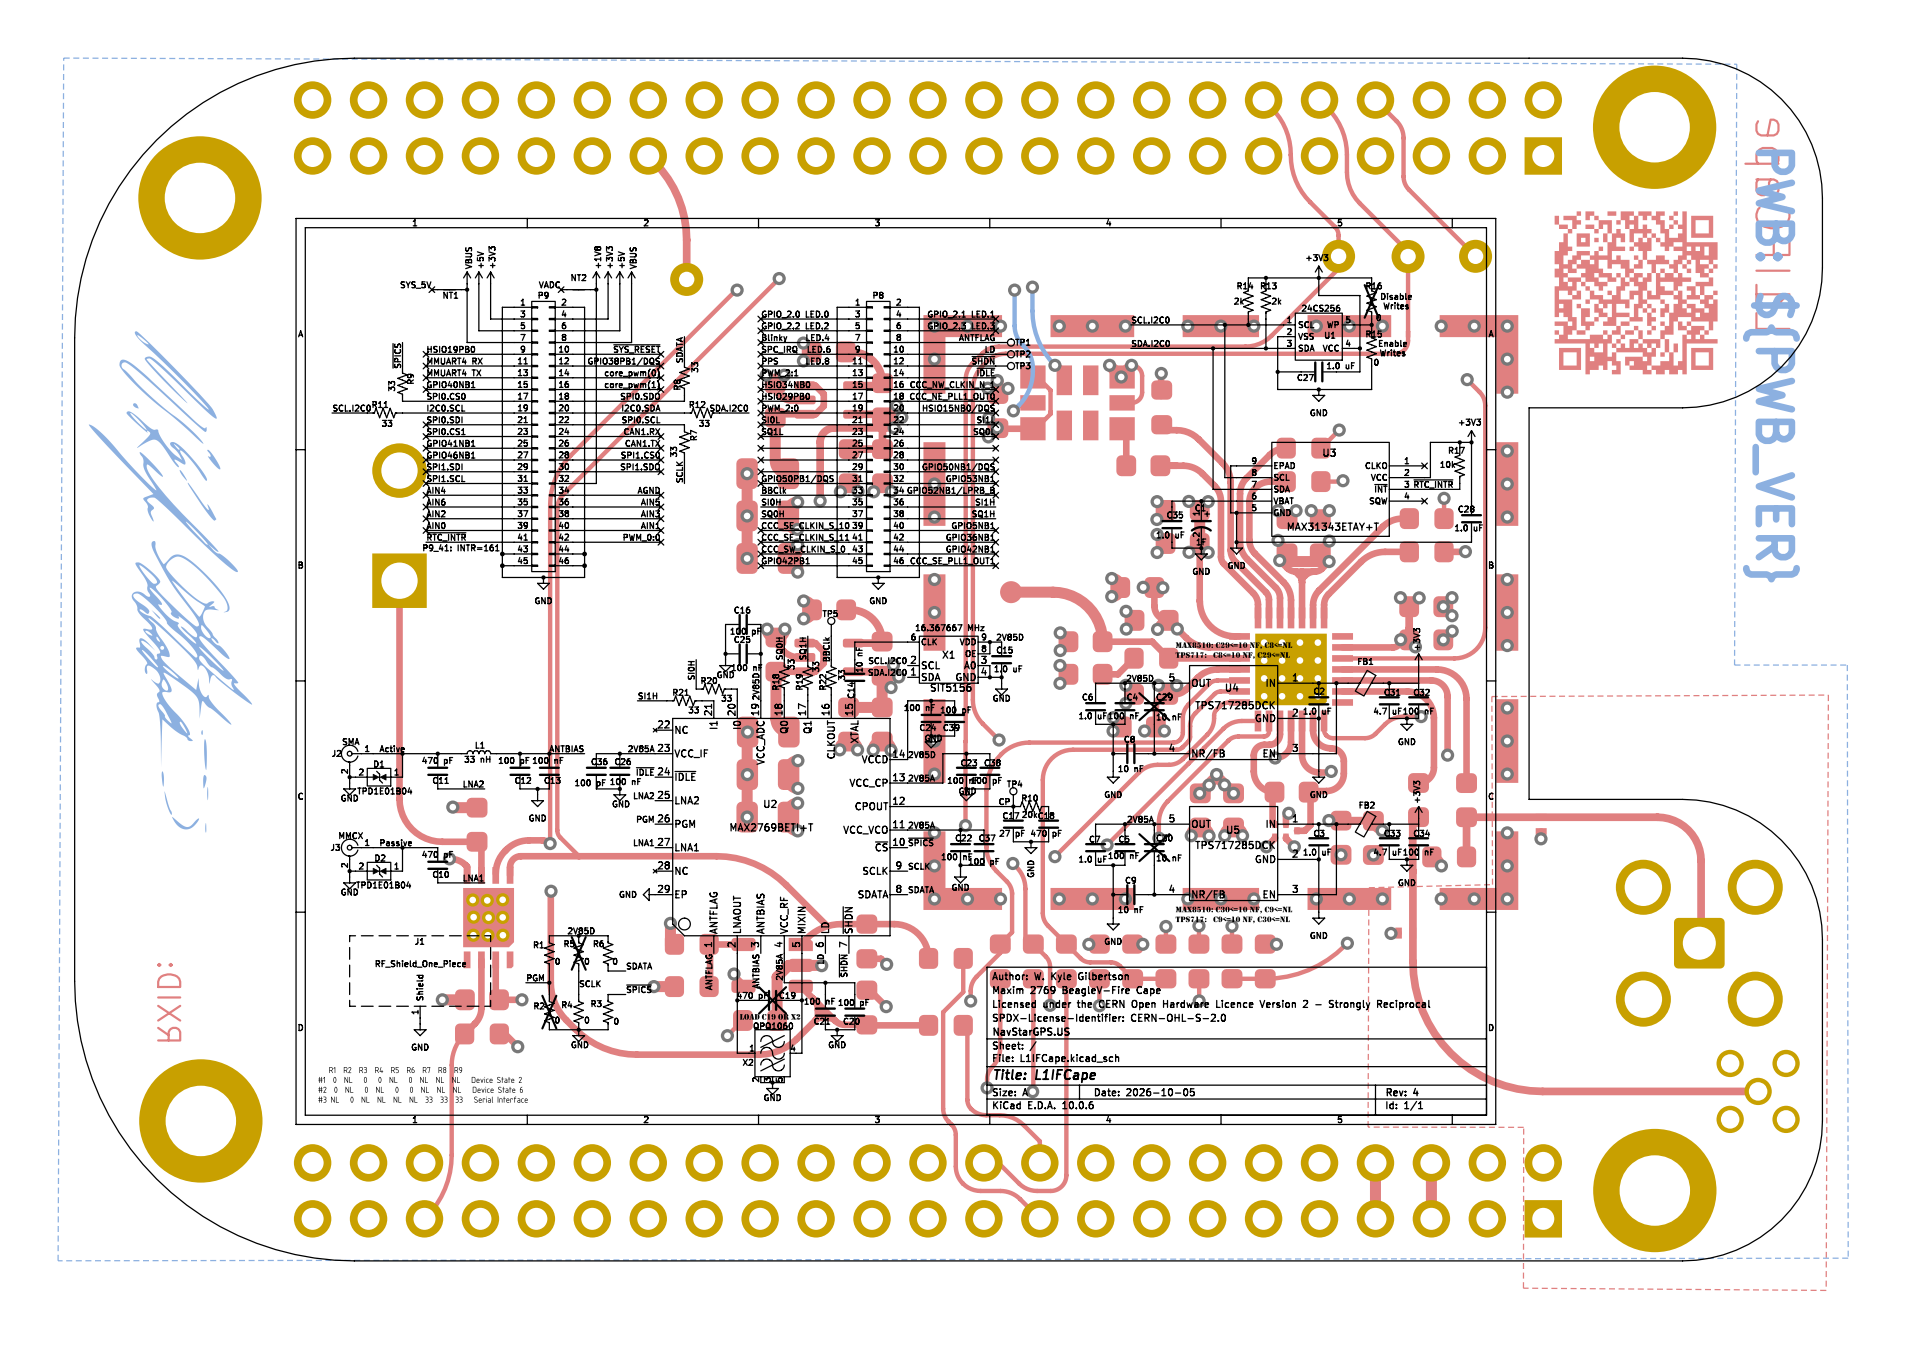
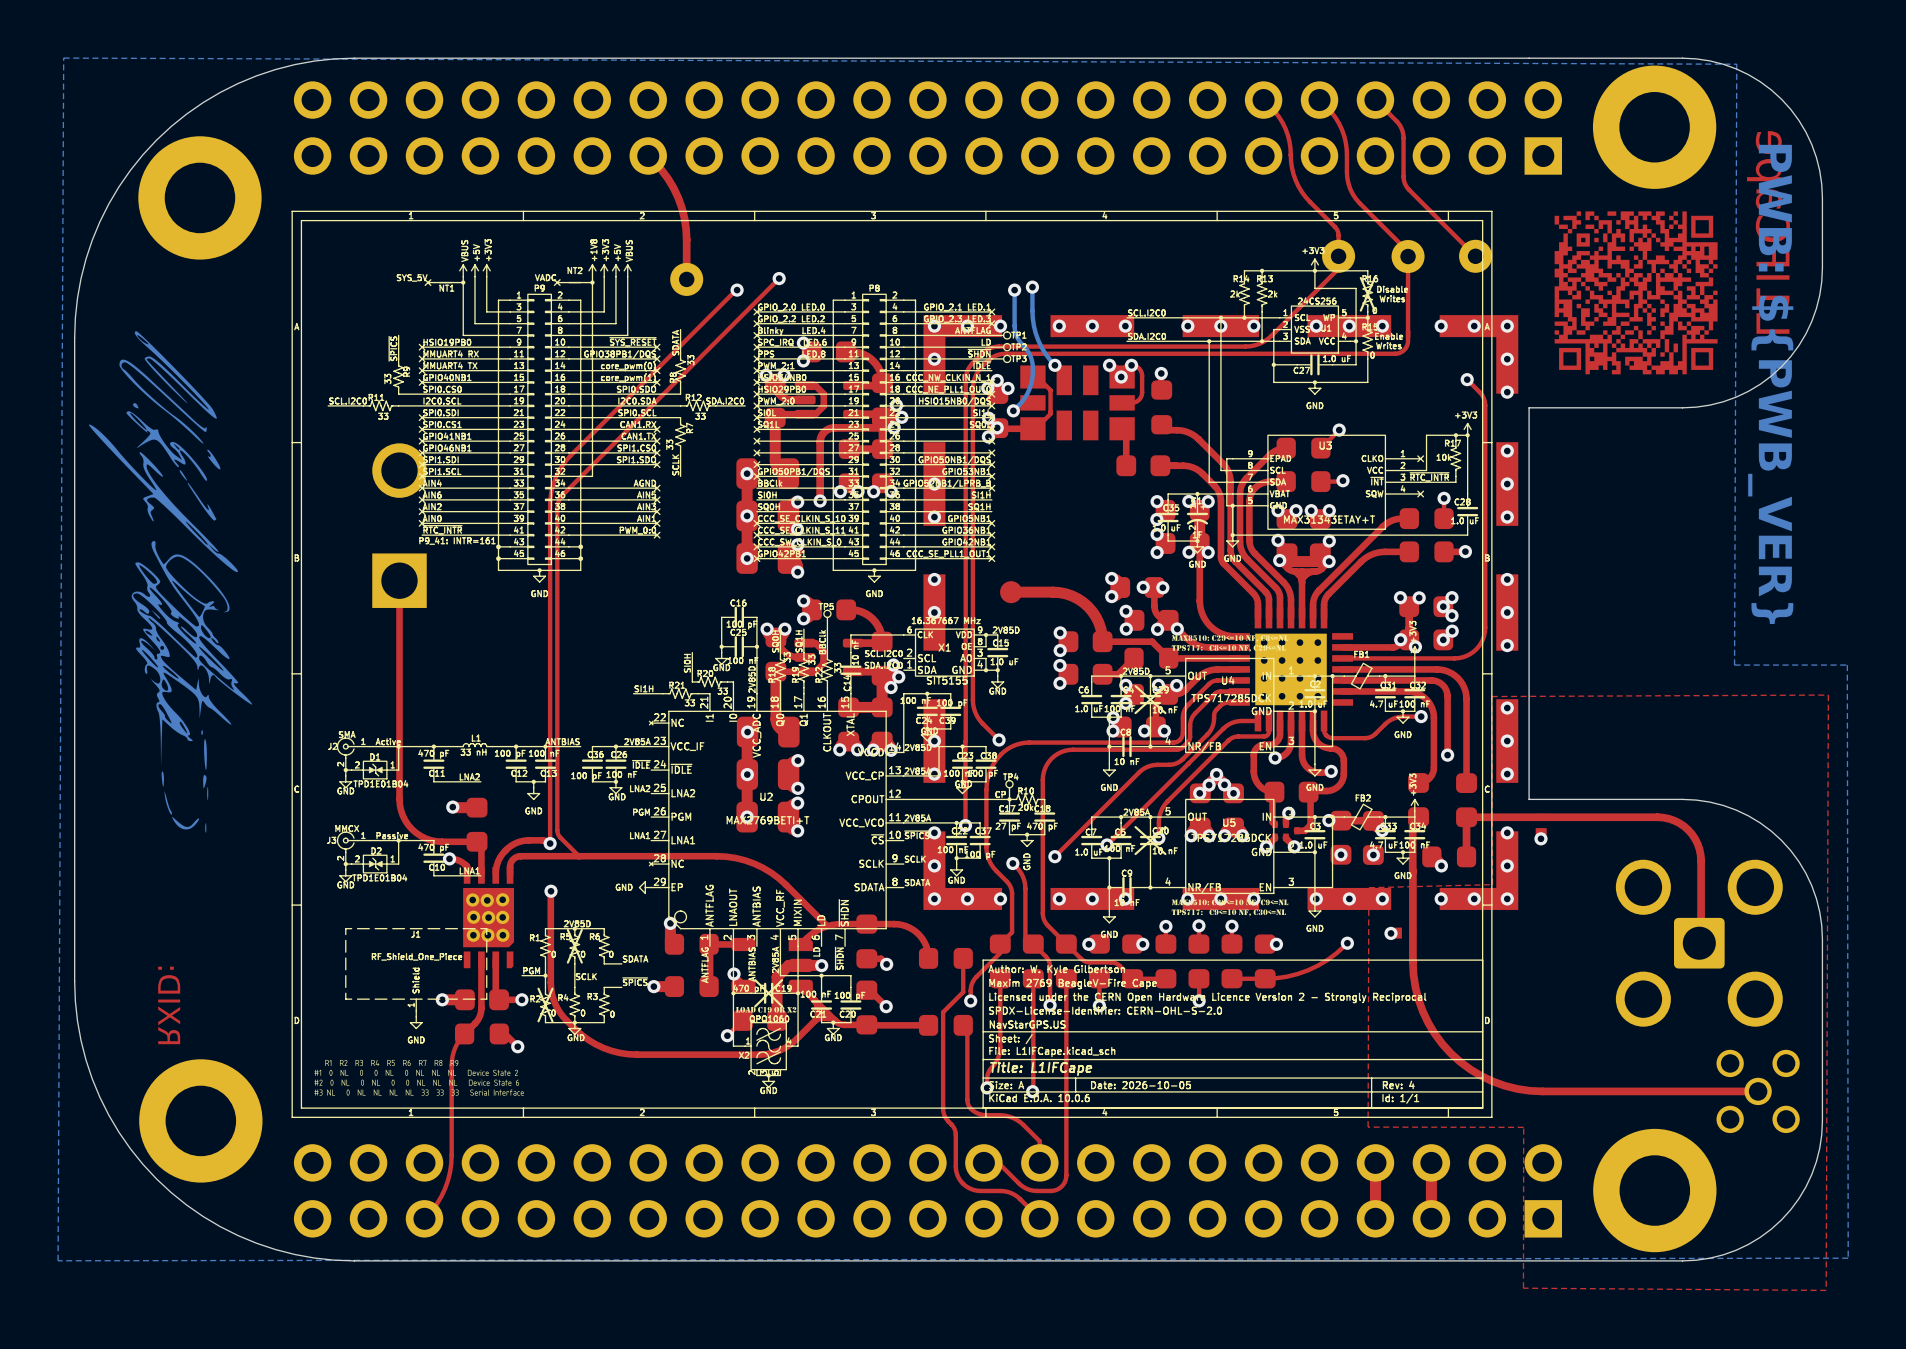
drawing shape: [295, 218, 1497, 1125] -> [291, 210, 1493, 1118]

